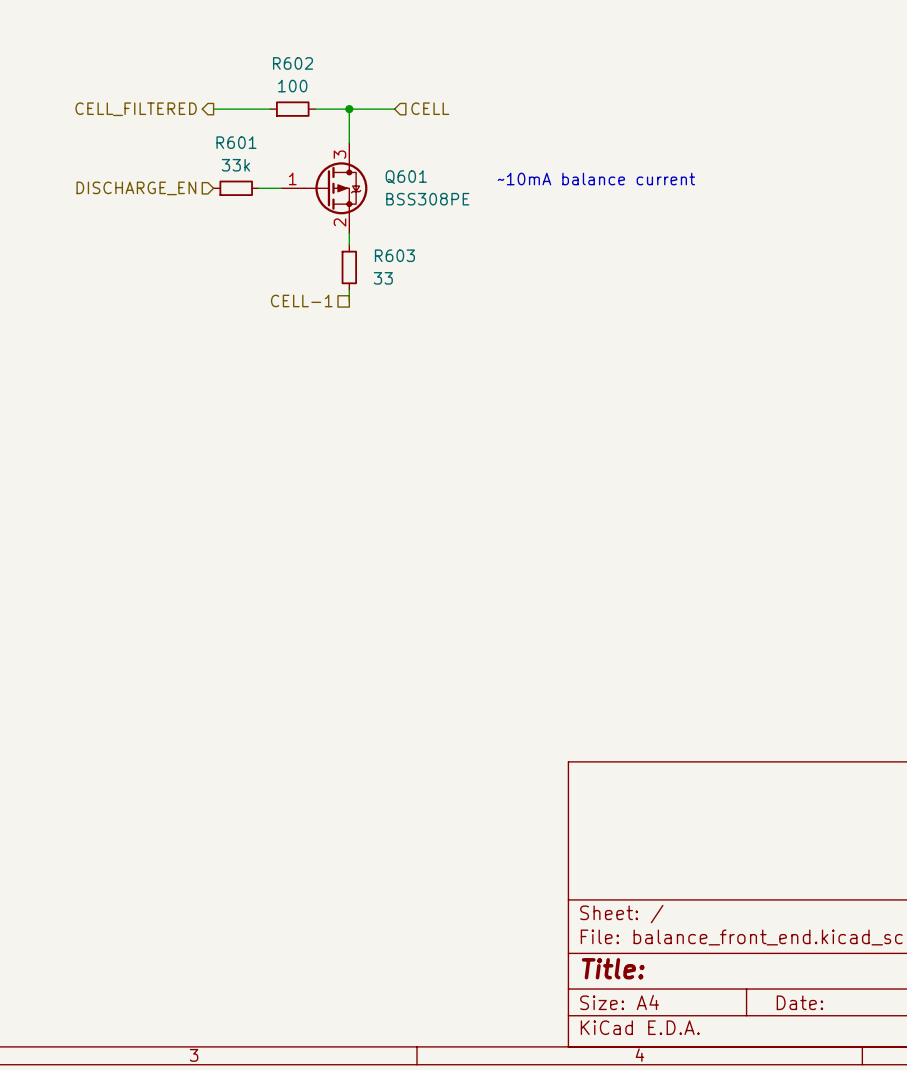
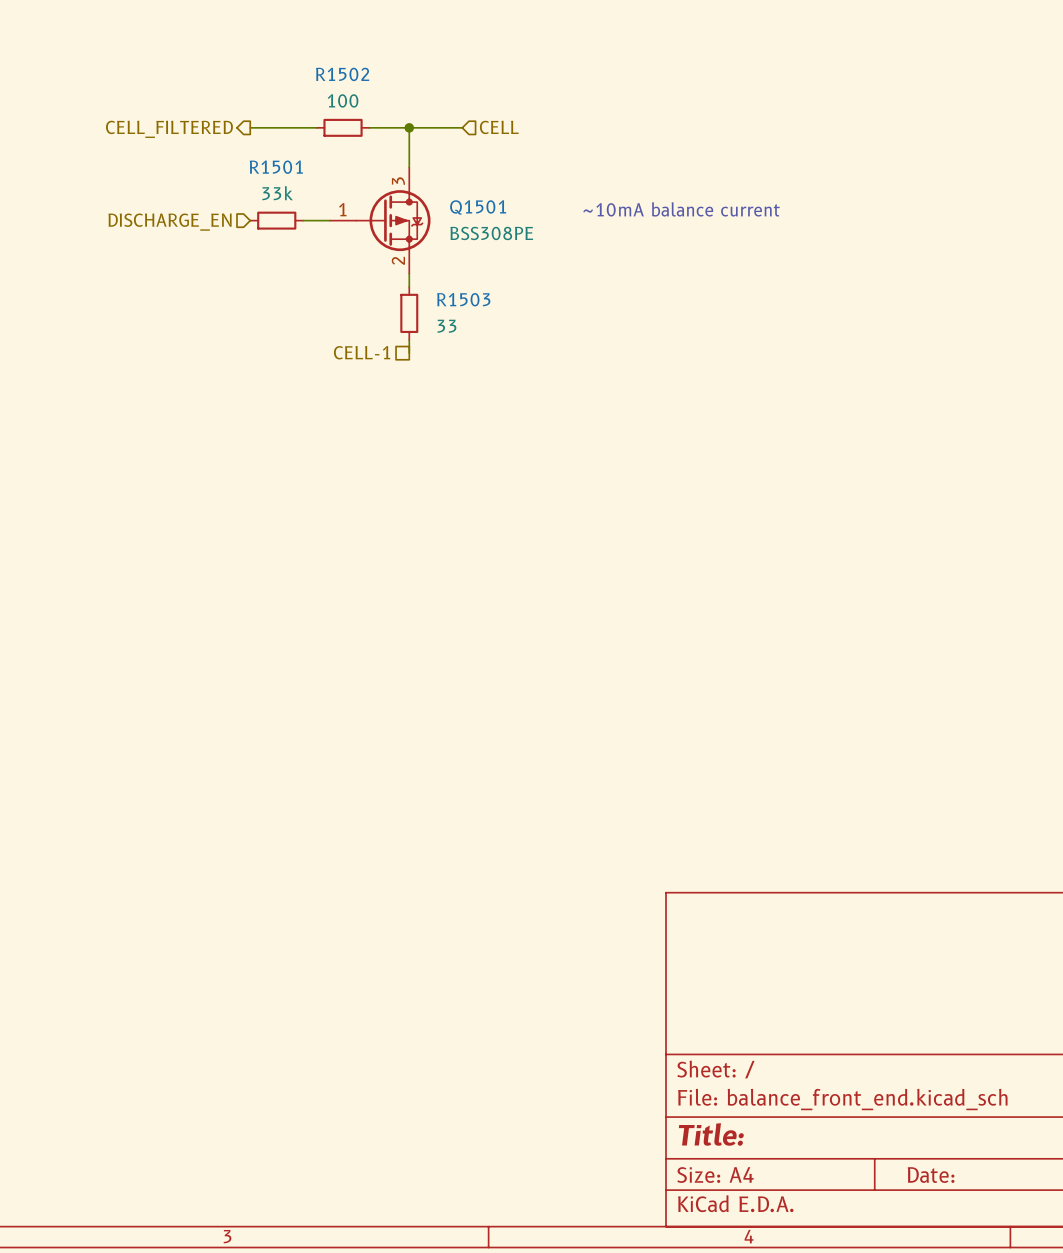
R602 name: R602 (293, 63) -> R1502 (342, 74)
R601 name: R601 (236, 142) -> R1501 (276, 167)
Q601 name: Q601 (406, 177) -> Q1501 (478, 207)
R603 name: R603 (394, 255) -> R1503 (463, 299)

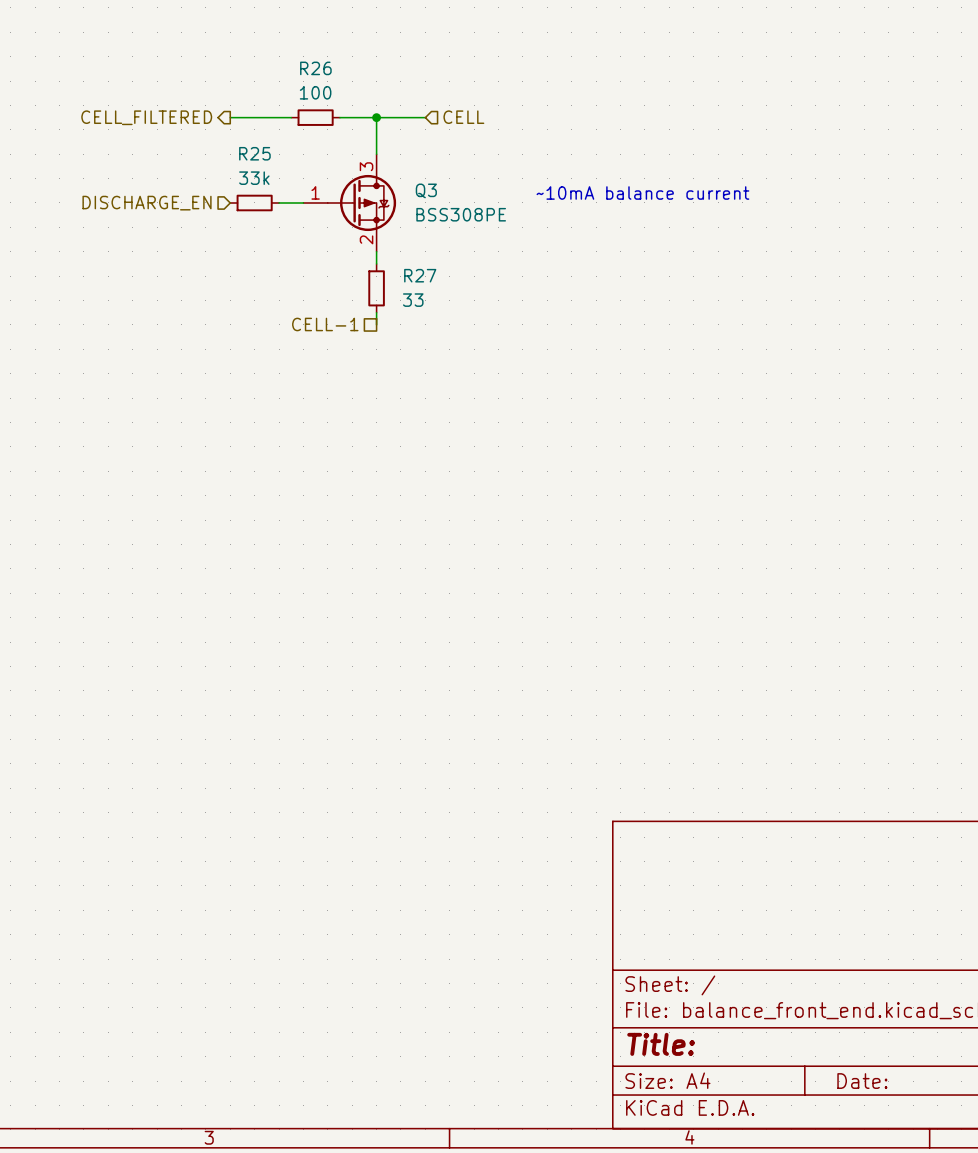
R1502 name: R1502 (342, 74) -> R26 (315, 68)
R1501 name: R1501 (276, 167) -> R25 (254, 153)
Q1501 name: Q1501 (478, 207) -> Q3 (426, 190)
R1503 name: R1503 (463, 299) -> R27 (420, 275)

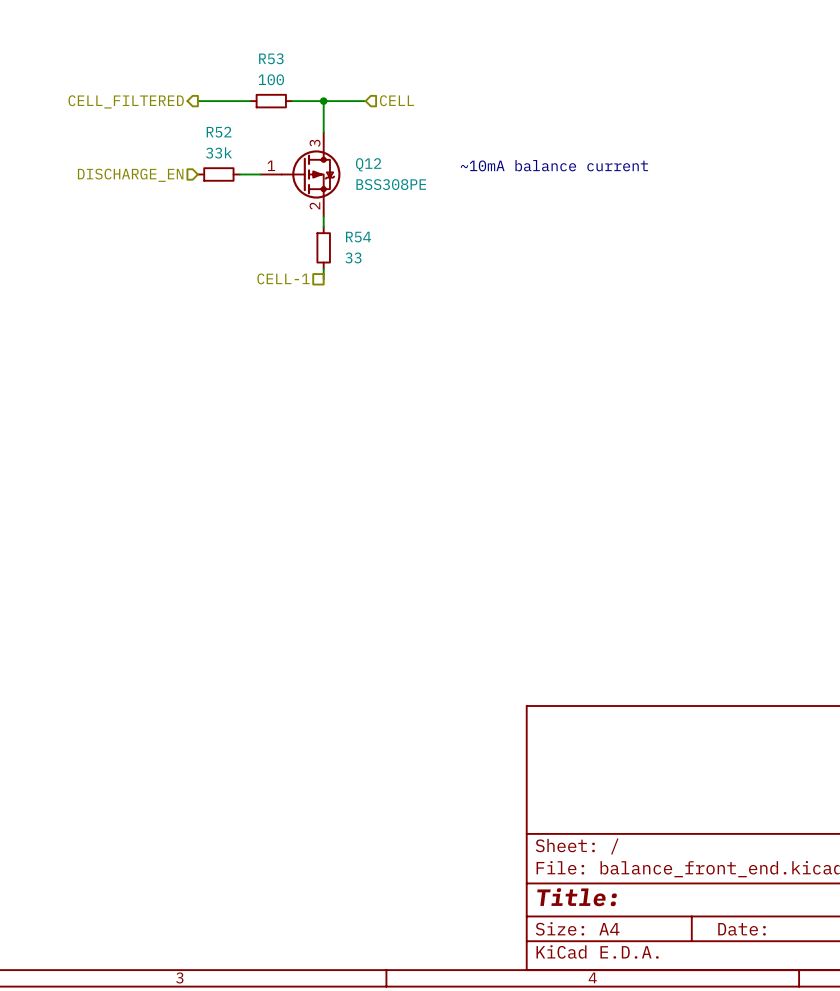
R26 name: R26 (315, 68) -> R53 (271, 58)
R25 name: R25 (254, 153) -> R52 (219, 132)
Q3 name: Q3 (426, 190) -> Q12 (368, 164)
R27 name: R27 (420, 275) -> R54 (358, 237)

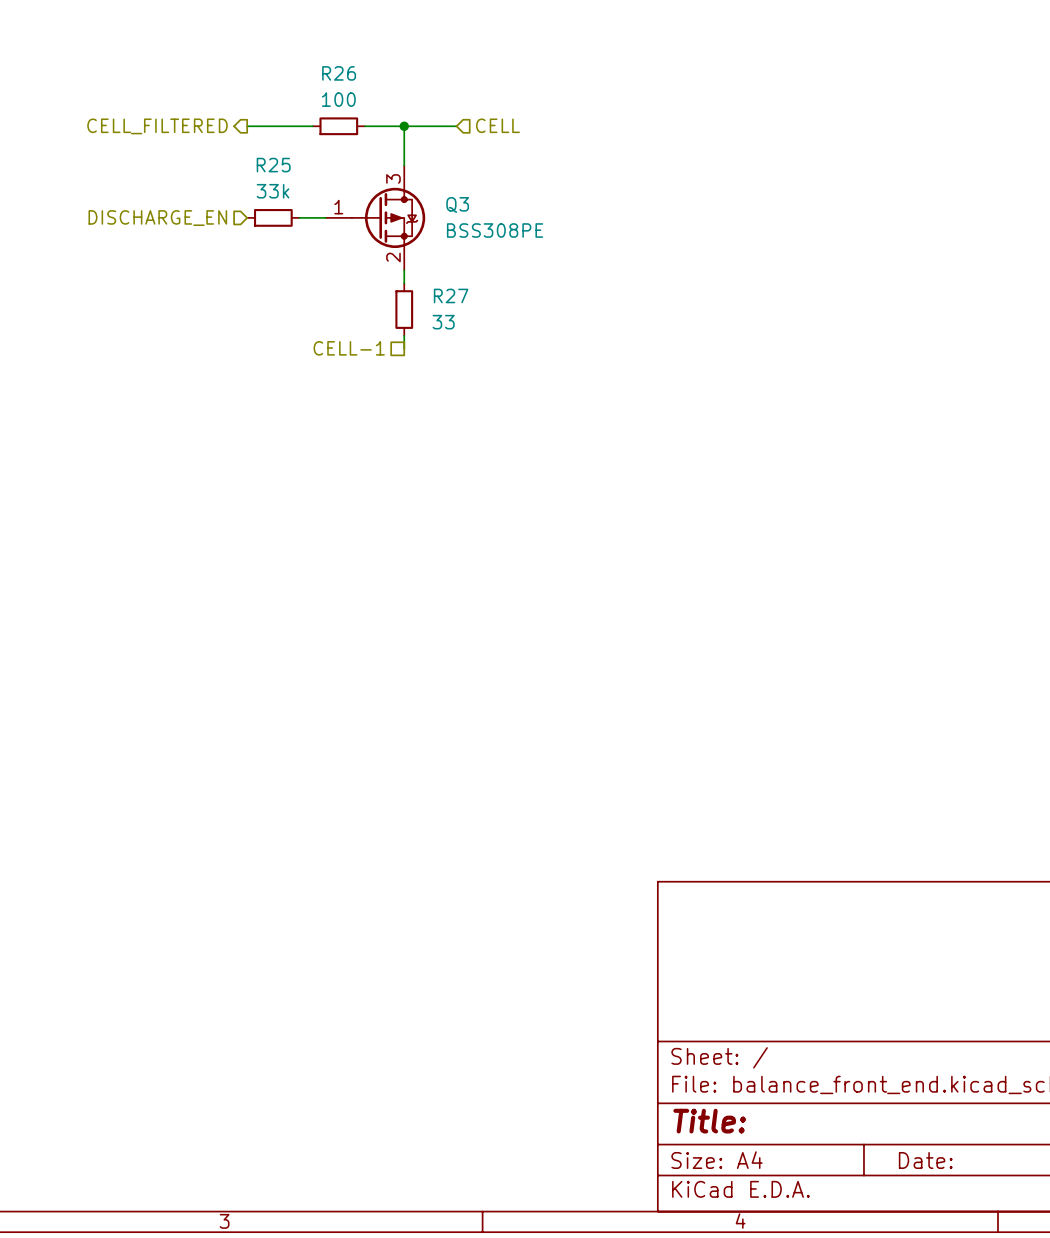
R53 name: R53 (271, 58) -> R26 (339, 73)
R52 name: R52 (219, 132) -> R25 (273, 165)
Q12 name: Q12 (368, 164) -> Q3 (457, 204)
text: ~10mA balance current (554, 165) -> none
R54 name: R54 (358, 237) -> R27 (451, 295)

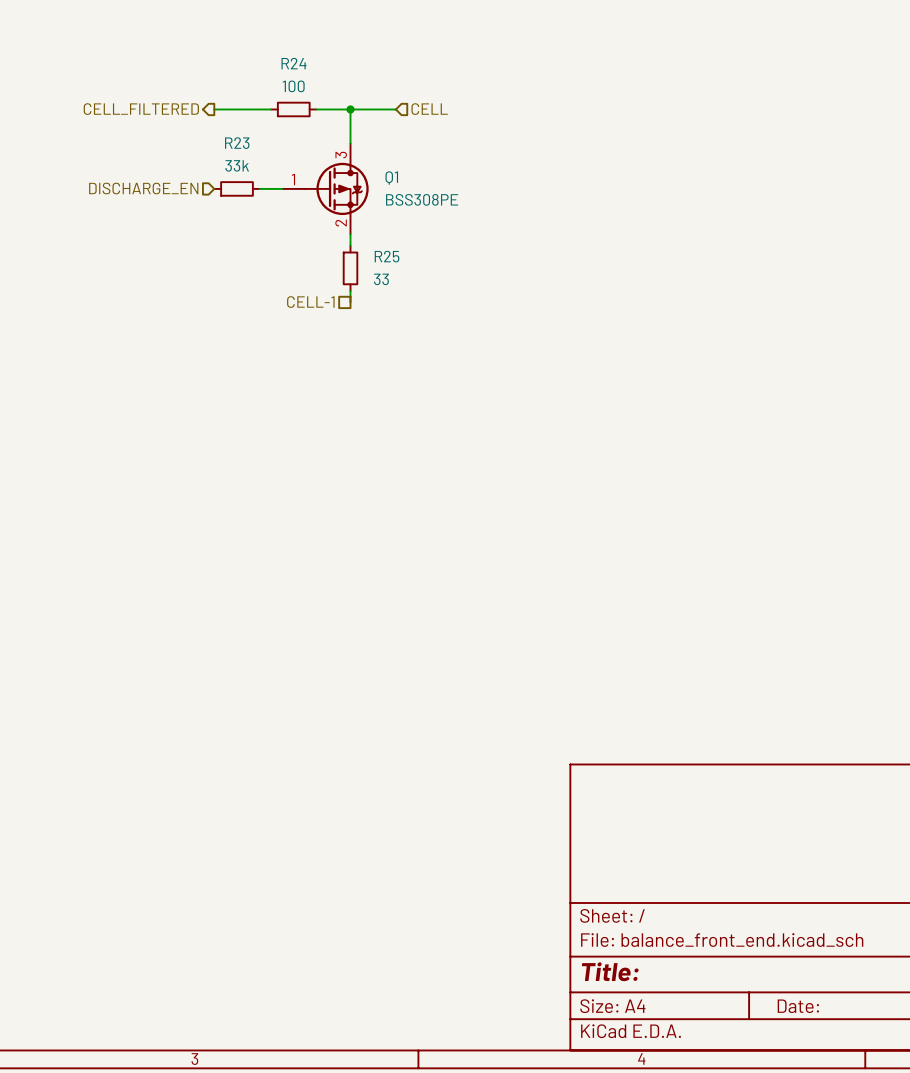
R26 name: R26 (339, 73) -> R24 (294, 63)
R25 name: R25 (273, 165) -> R23 (237, 143)
Q3 name: Q3 (457, 204) -> Q1 (391, 178)
R27 name: R27 (451, 295) -> R25 (387, 256)

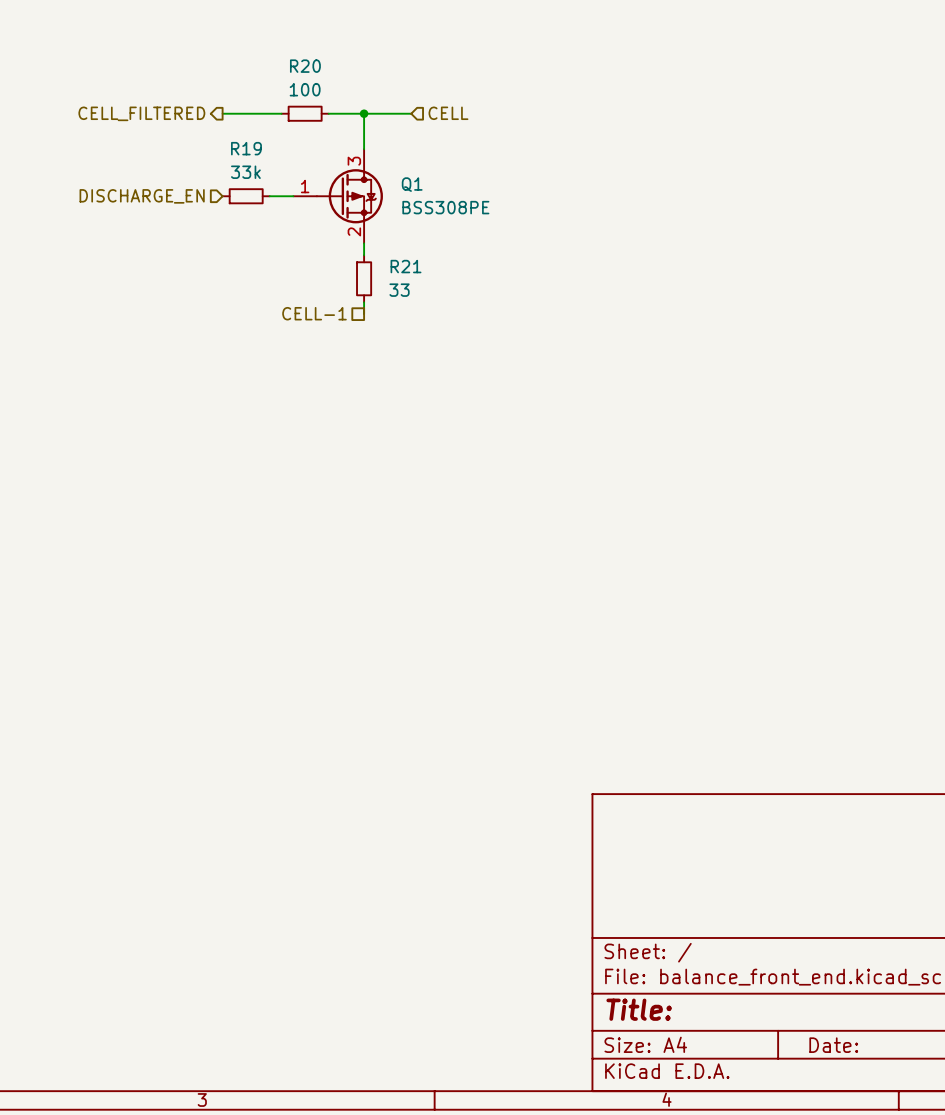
R24 name: R24 (294, 63) -> R20 (305, 66)
R23 name: R23 (237, 143) -> R19 (246, 148)
R25 name: R25 (387, 256) -> R21 (406, 266)

